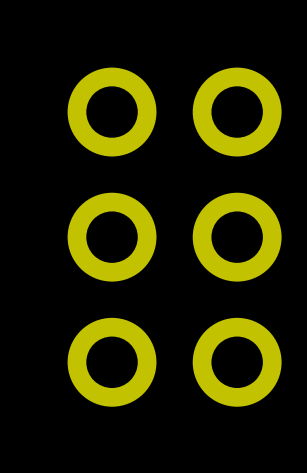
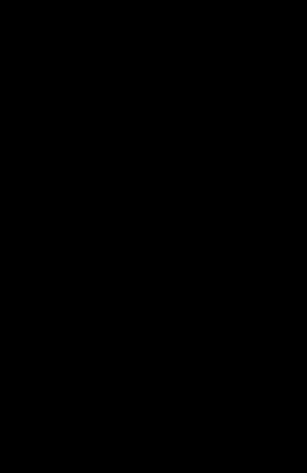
part: (112, 112) -> none
part: (237, 112) -> none
part: (112, 237) -> none
part: (237, 237) -> none
part: (112, 362) -> none
part: (237, 362) -> none

